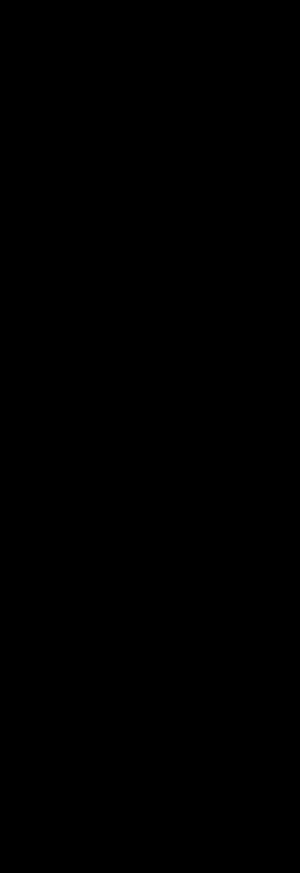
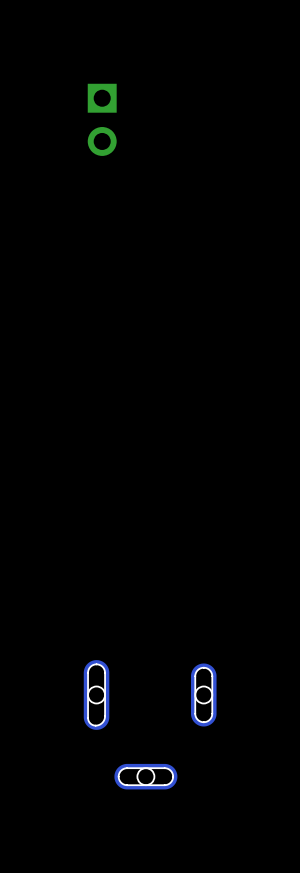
part: none -> (102, 119)
part: none -> (150, 724)

